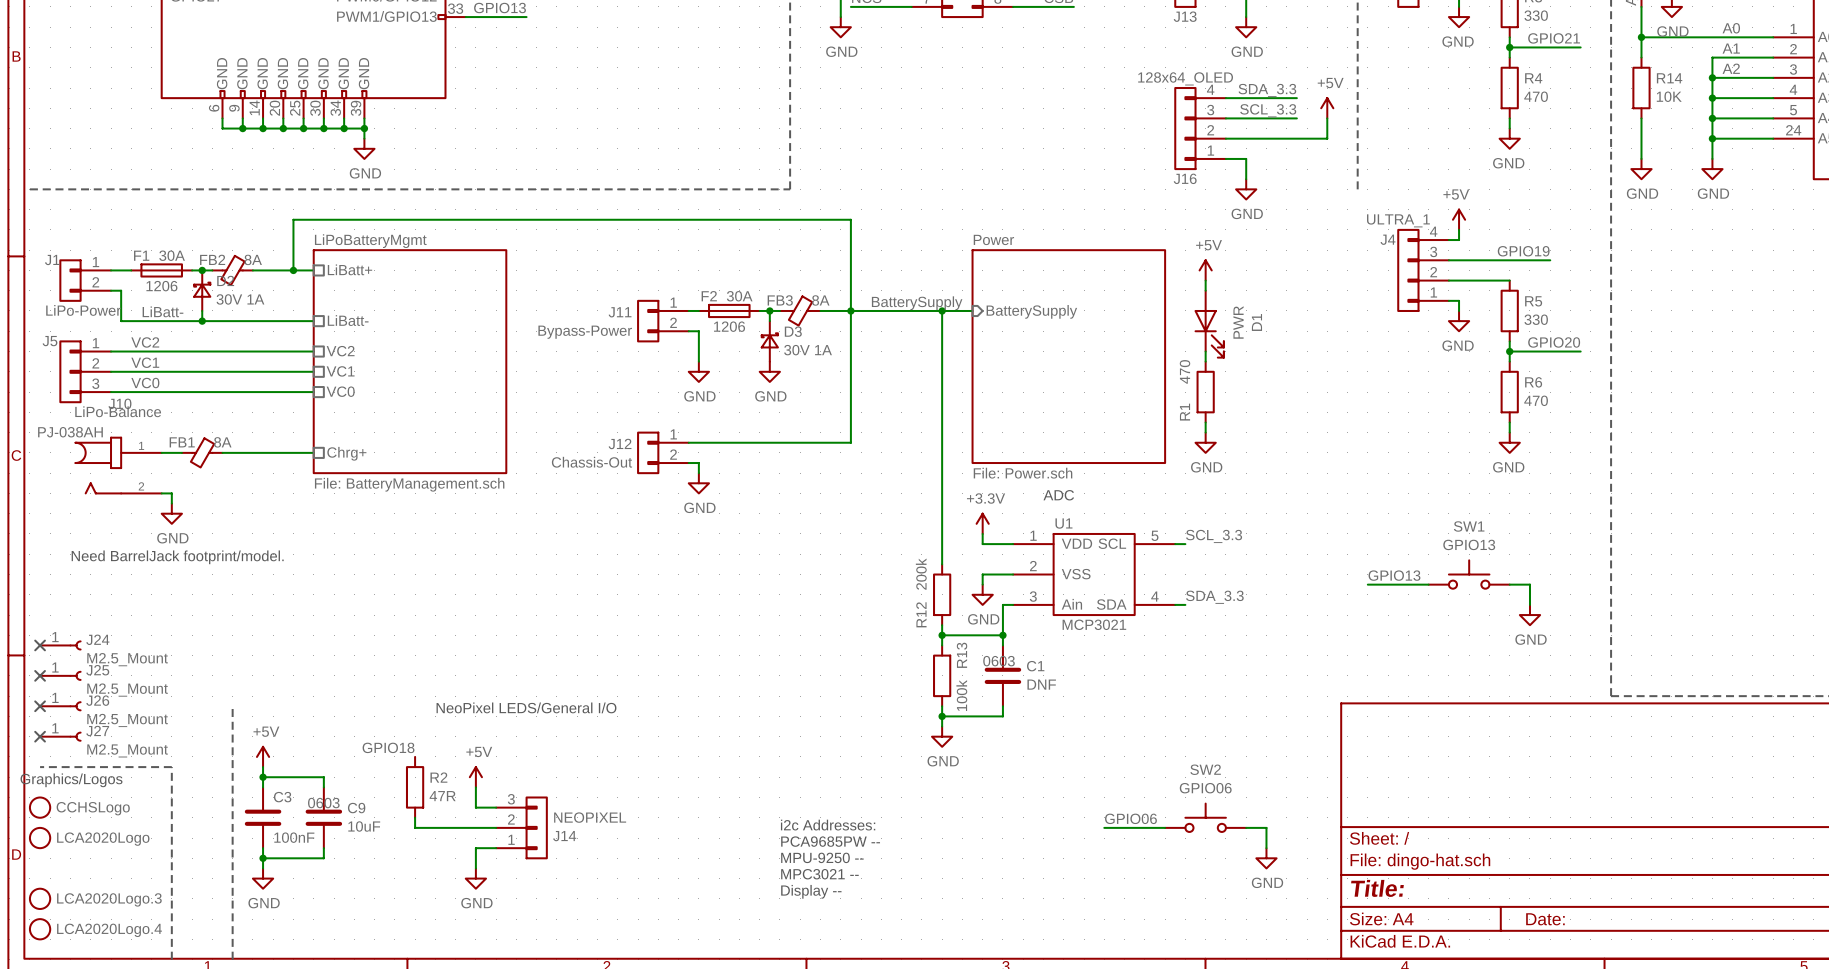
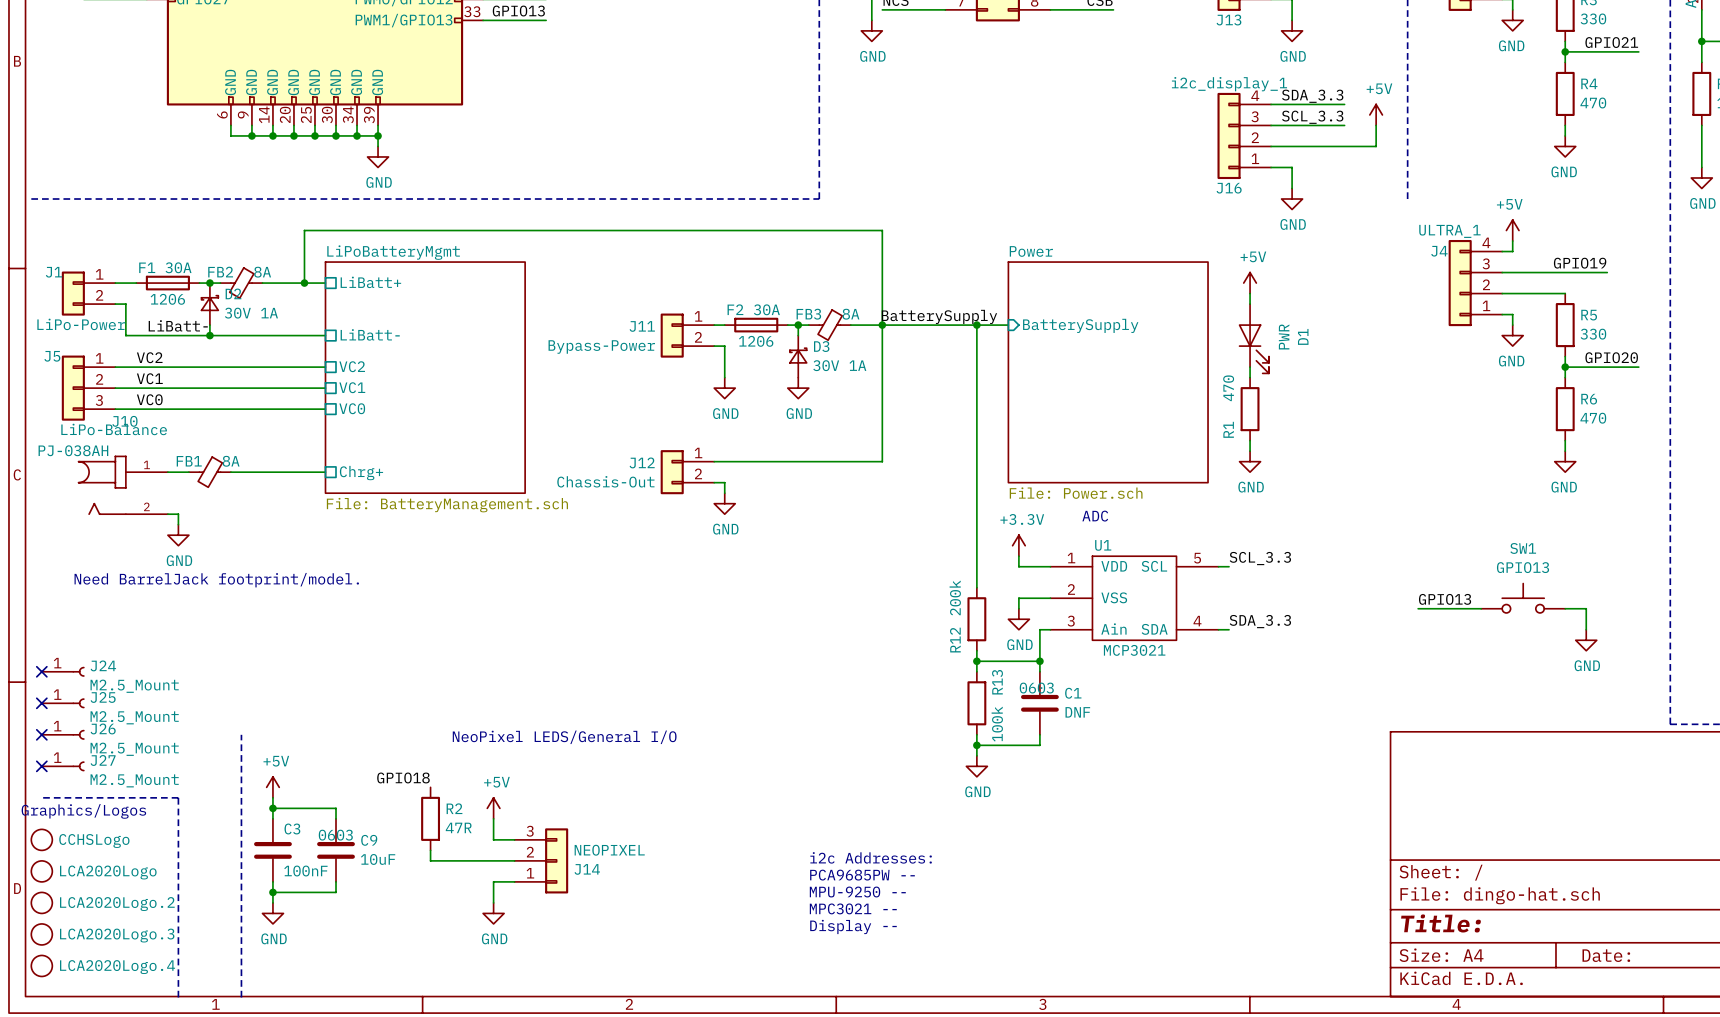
J16 value: 128x64_OLED (1185, 78) -> i2c_display_1 (1229, 84)
SW2: GPIO06 (1205, 817) -> none
label: GPIO06 (1130, 818) -> none
wire: (1104, 827) (1165, 827) -> none
wire: (1246, 827) (1266, 827) (1266, 848) -> none
power symbol: GND (1266, 858) -> none
part: none -> LCA2020Logo.2 (41, 902)

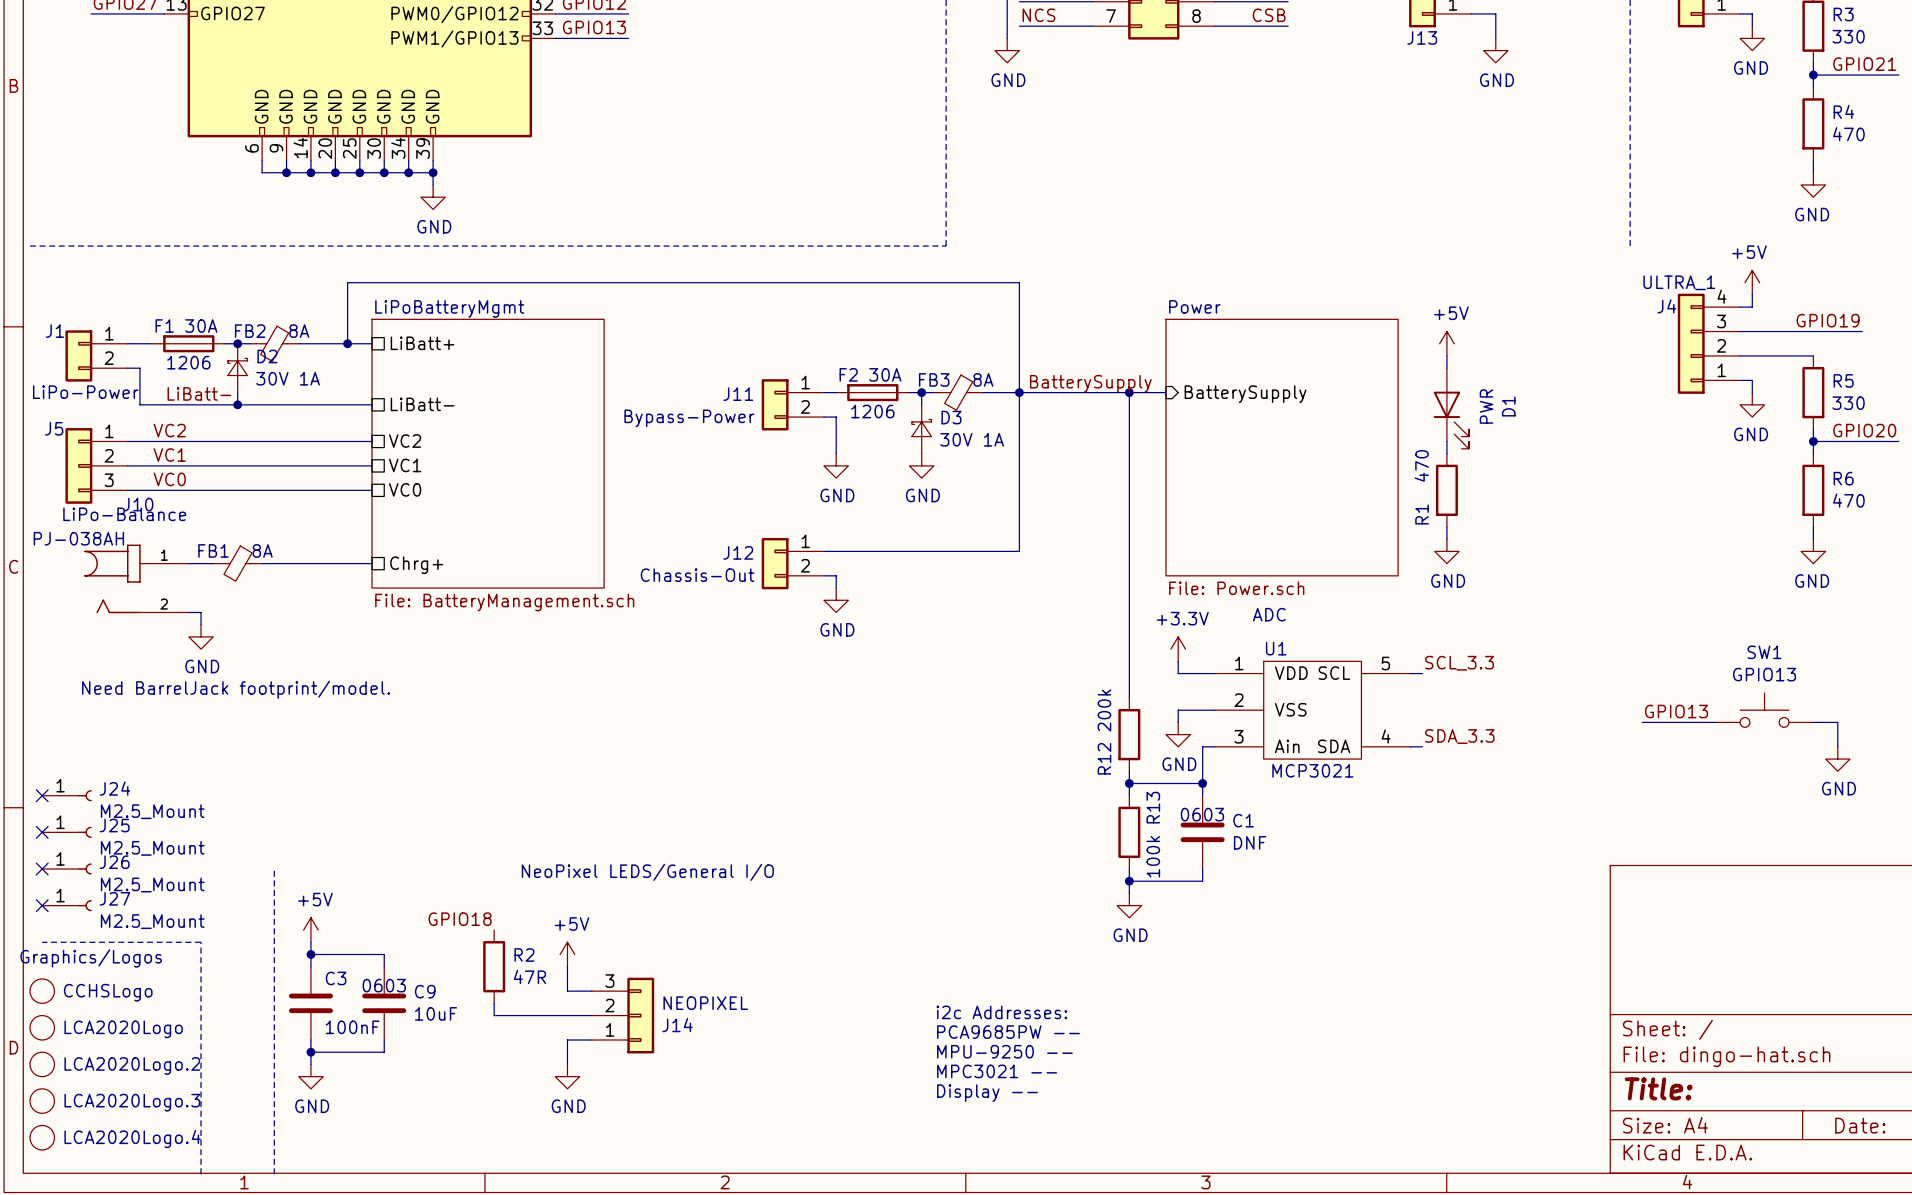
label: SDA_3.3 (1312, 96) -> none
wire: (1271, 104) (1344, 104) -> none
power symbol: +5V (1376, 114) -> none
label: SCL_3.3 (1312, 117) -> none
wire: (1271, 125) (1344, 125) -> none
wire: (1376, 125) (1376, 146) (1271, 146) -> none
J16: i2c_display_1 (1244, 135) -> none
wire: (1271, 167) (1292, 167) (1292, 188) -> none
power symbol: GND (1292, 199) -> none

